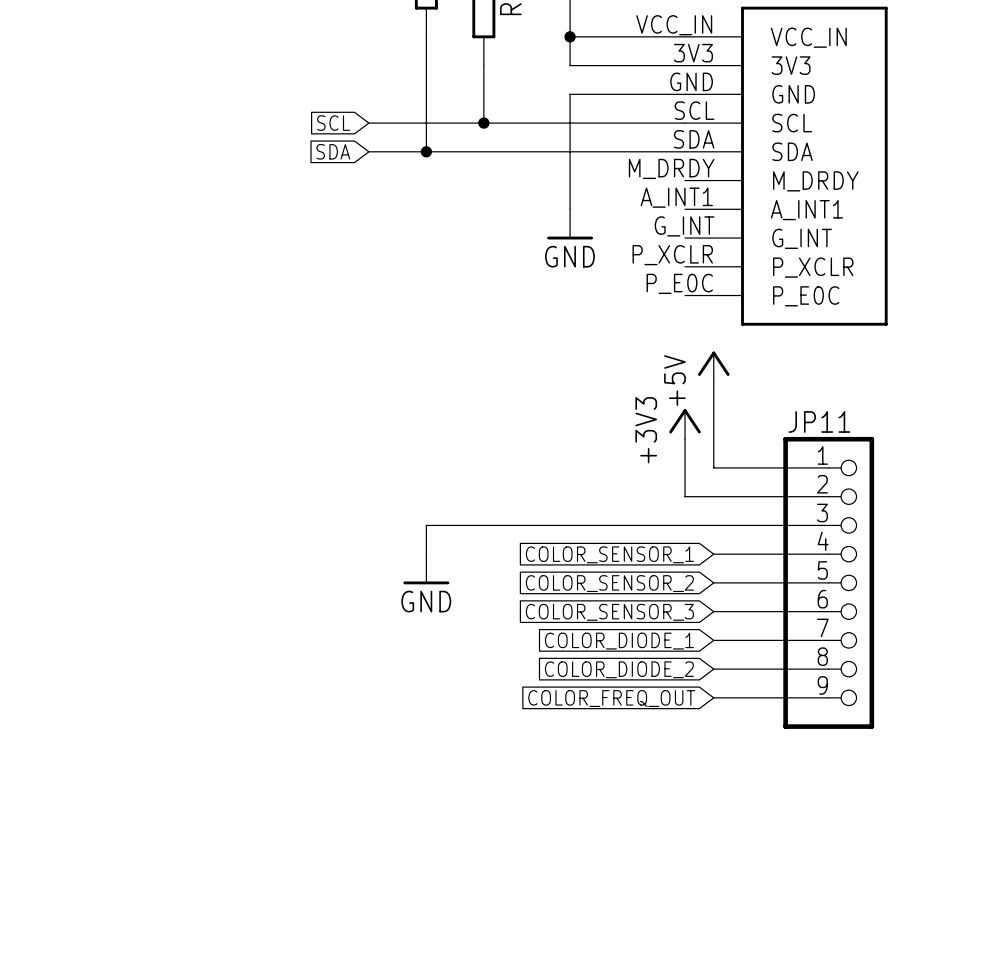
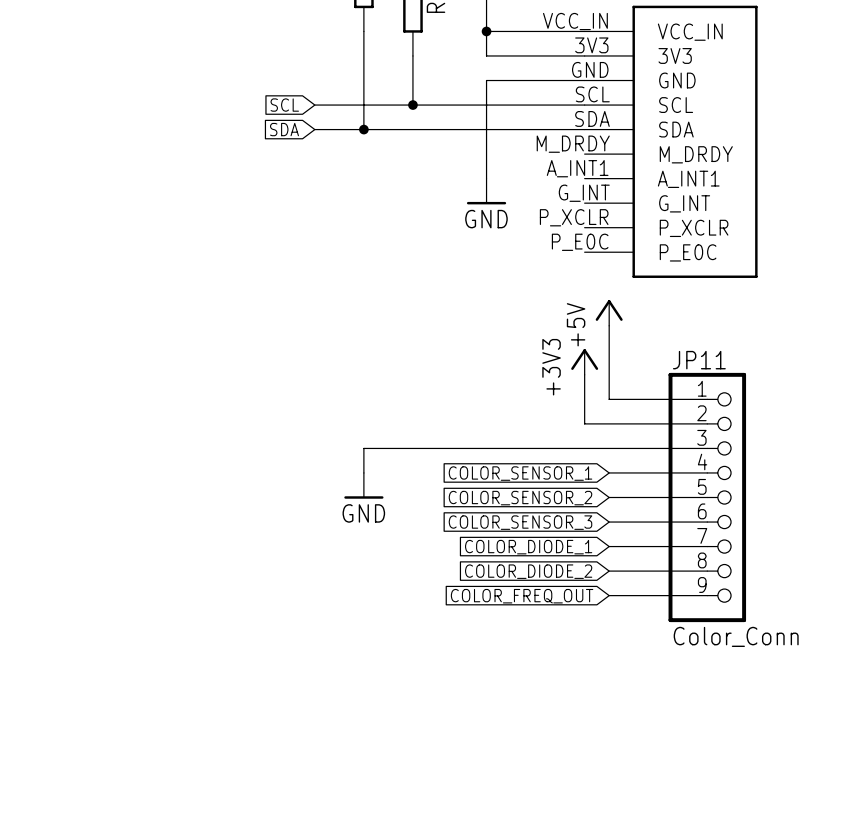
JP11 value: none -> Color_Conn (736, 636)

